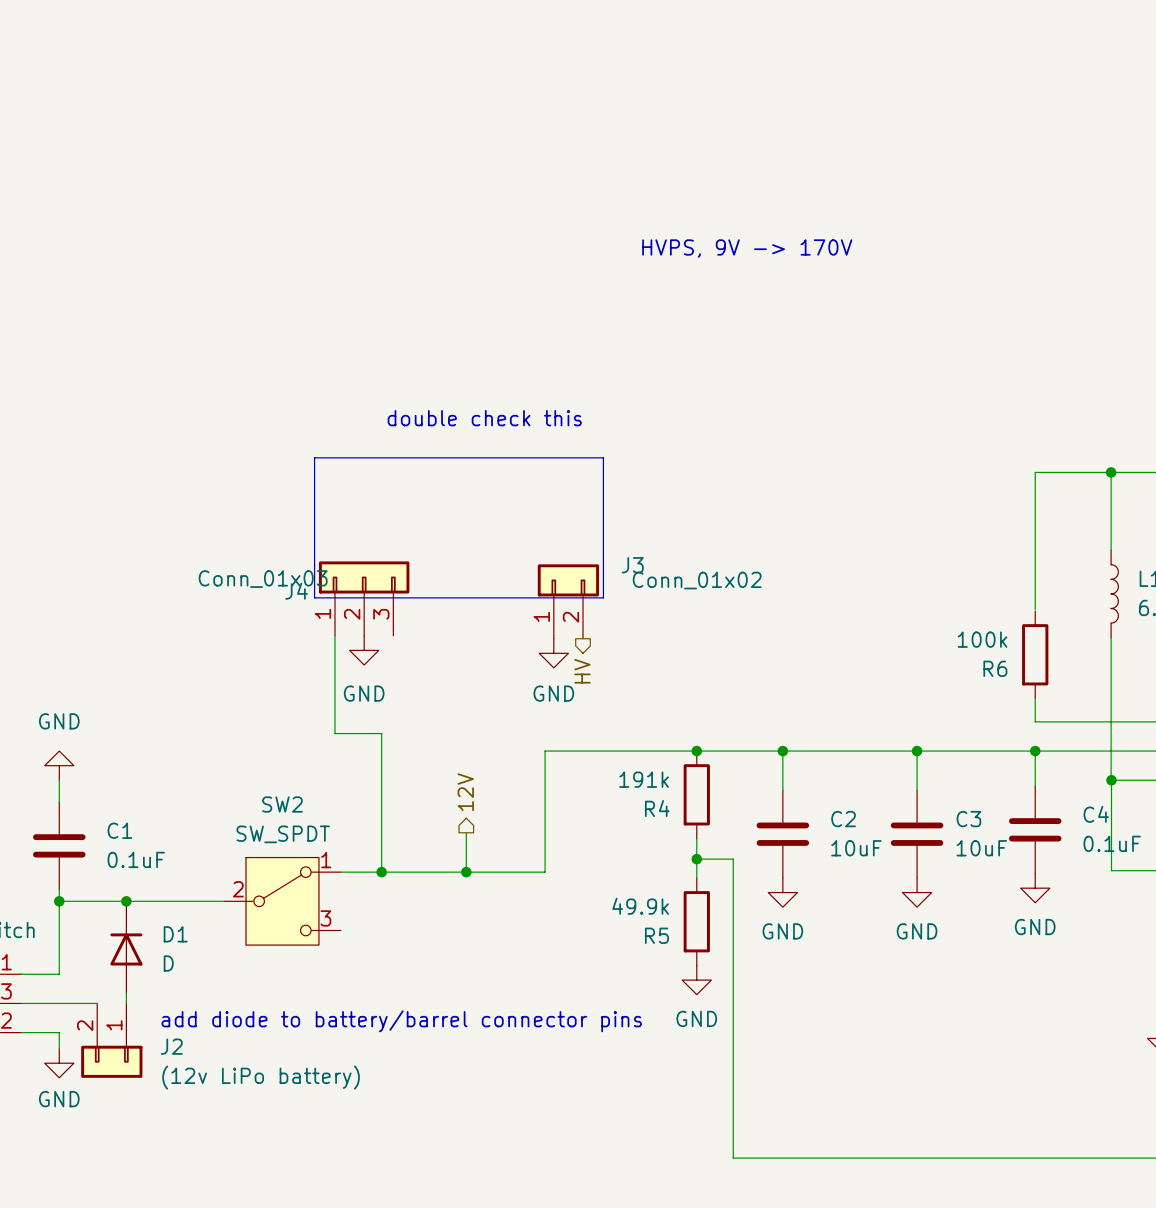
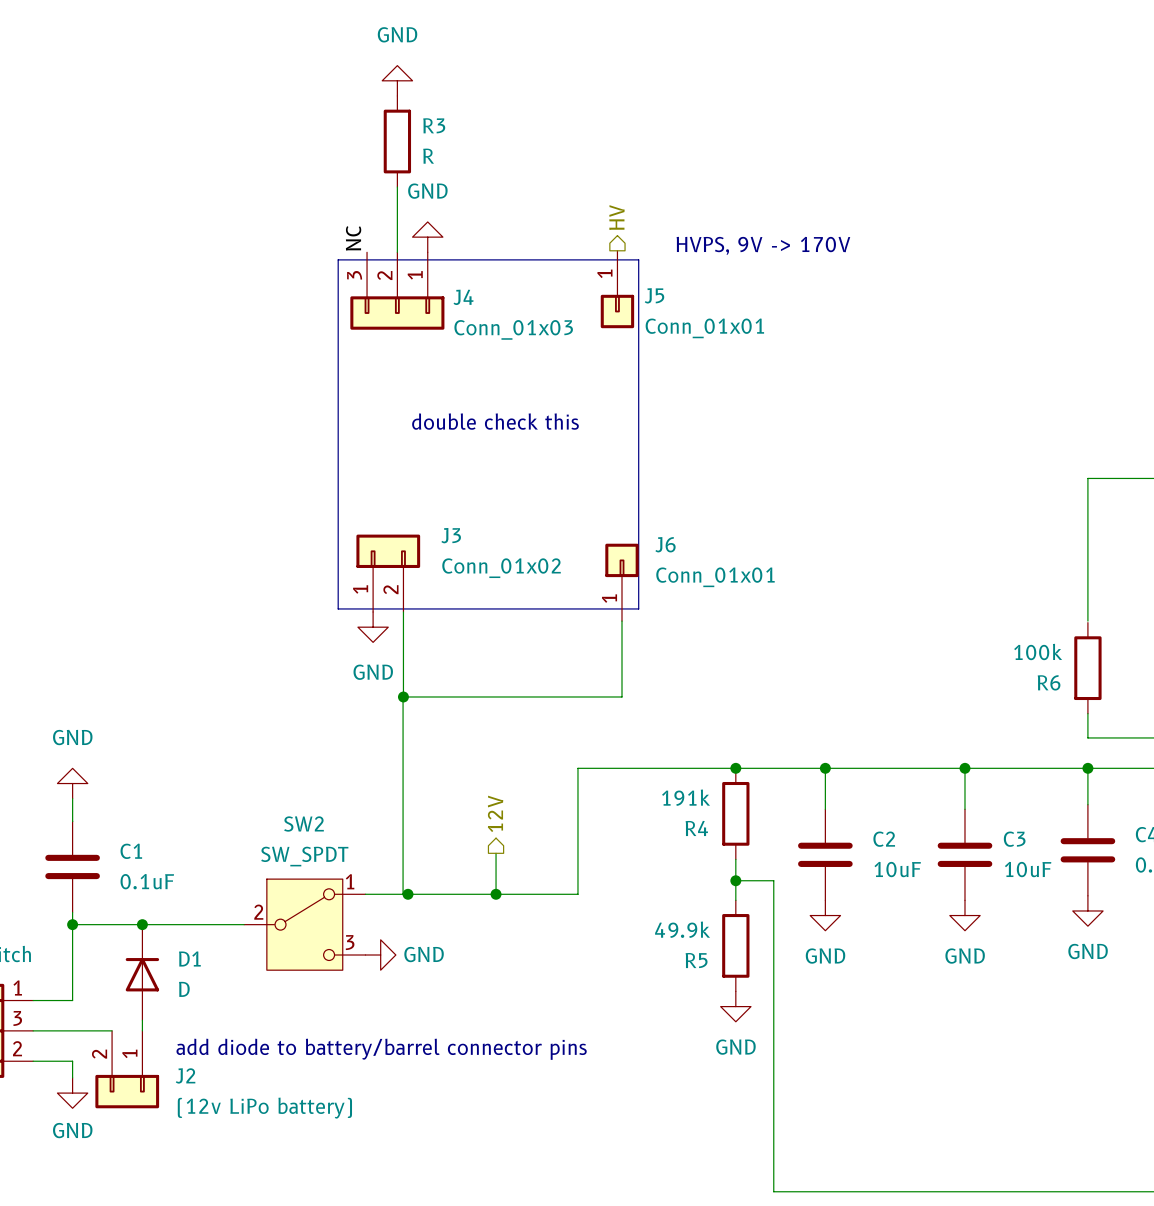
power symbol: none -> GND (397, 80)
R3: none -> R (397, 141)
wire: none -> (397, 187) (397, 252)
hierarchical label: none -> HV (616, 217)
label: none -> NC (353, 238)
power symbol: none -> GND (427, 237)
J5: none -> Conn_01x01 (617, 289)
line: (314, 457) (603, 457) -> (338, 463) (338, 259) (638, 259) (638, 463)
J6: none -> Conn_01x01 (622, 582)
J4 rotation: 0° (364, 577) -> 180° (397, 313)
J4 value position: Conn_01x03 (263, 579) -> Conn_01x03 (513, 329)
J3 value position: Conn_01x02 (697, 580) -> Conn_01x02 (501, 568)
J4 position: (364, 598) -> (397, 291)
wire: none -> (403, 612) (403, 696)
J3 position: (568, 601) -> (388, 573)
wire: none -> (622, 621) (622, 696) (403, 696) (403, 894)
wire: (335, 635) (335, 733) (381, 733) (381, 872) -> none
power symbol position: GND (364, 650) -> GND (373, 627)
power symbol: GND (553, 653) -> none
hierarchical label: HV (582, 671) -> none
junction: none -> (403, 696)
power symbol: none -> GND (380, 955)

